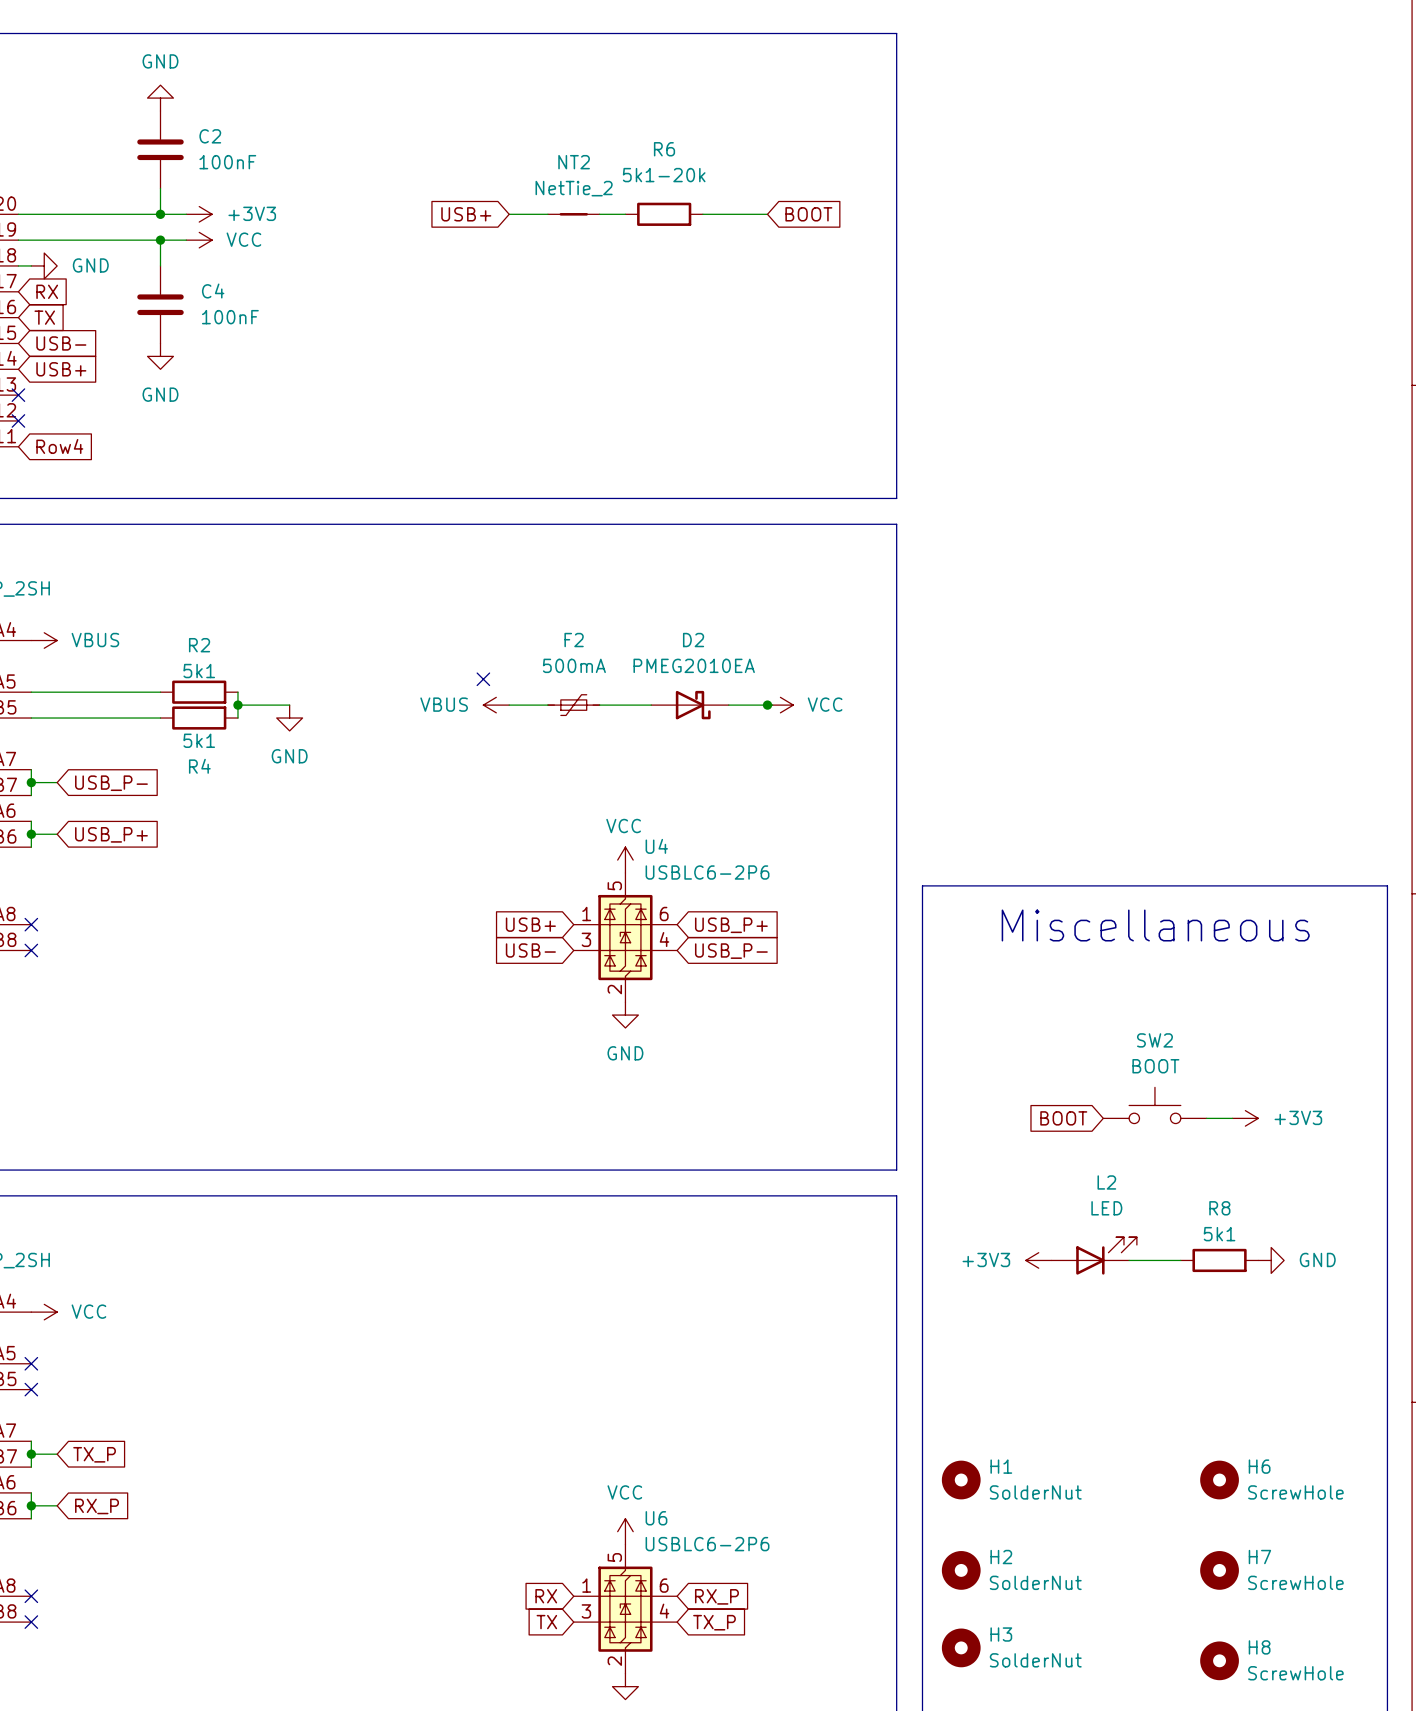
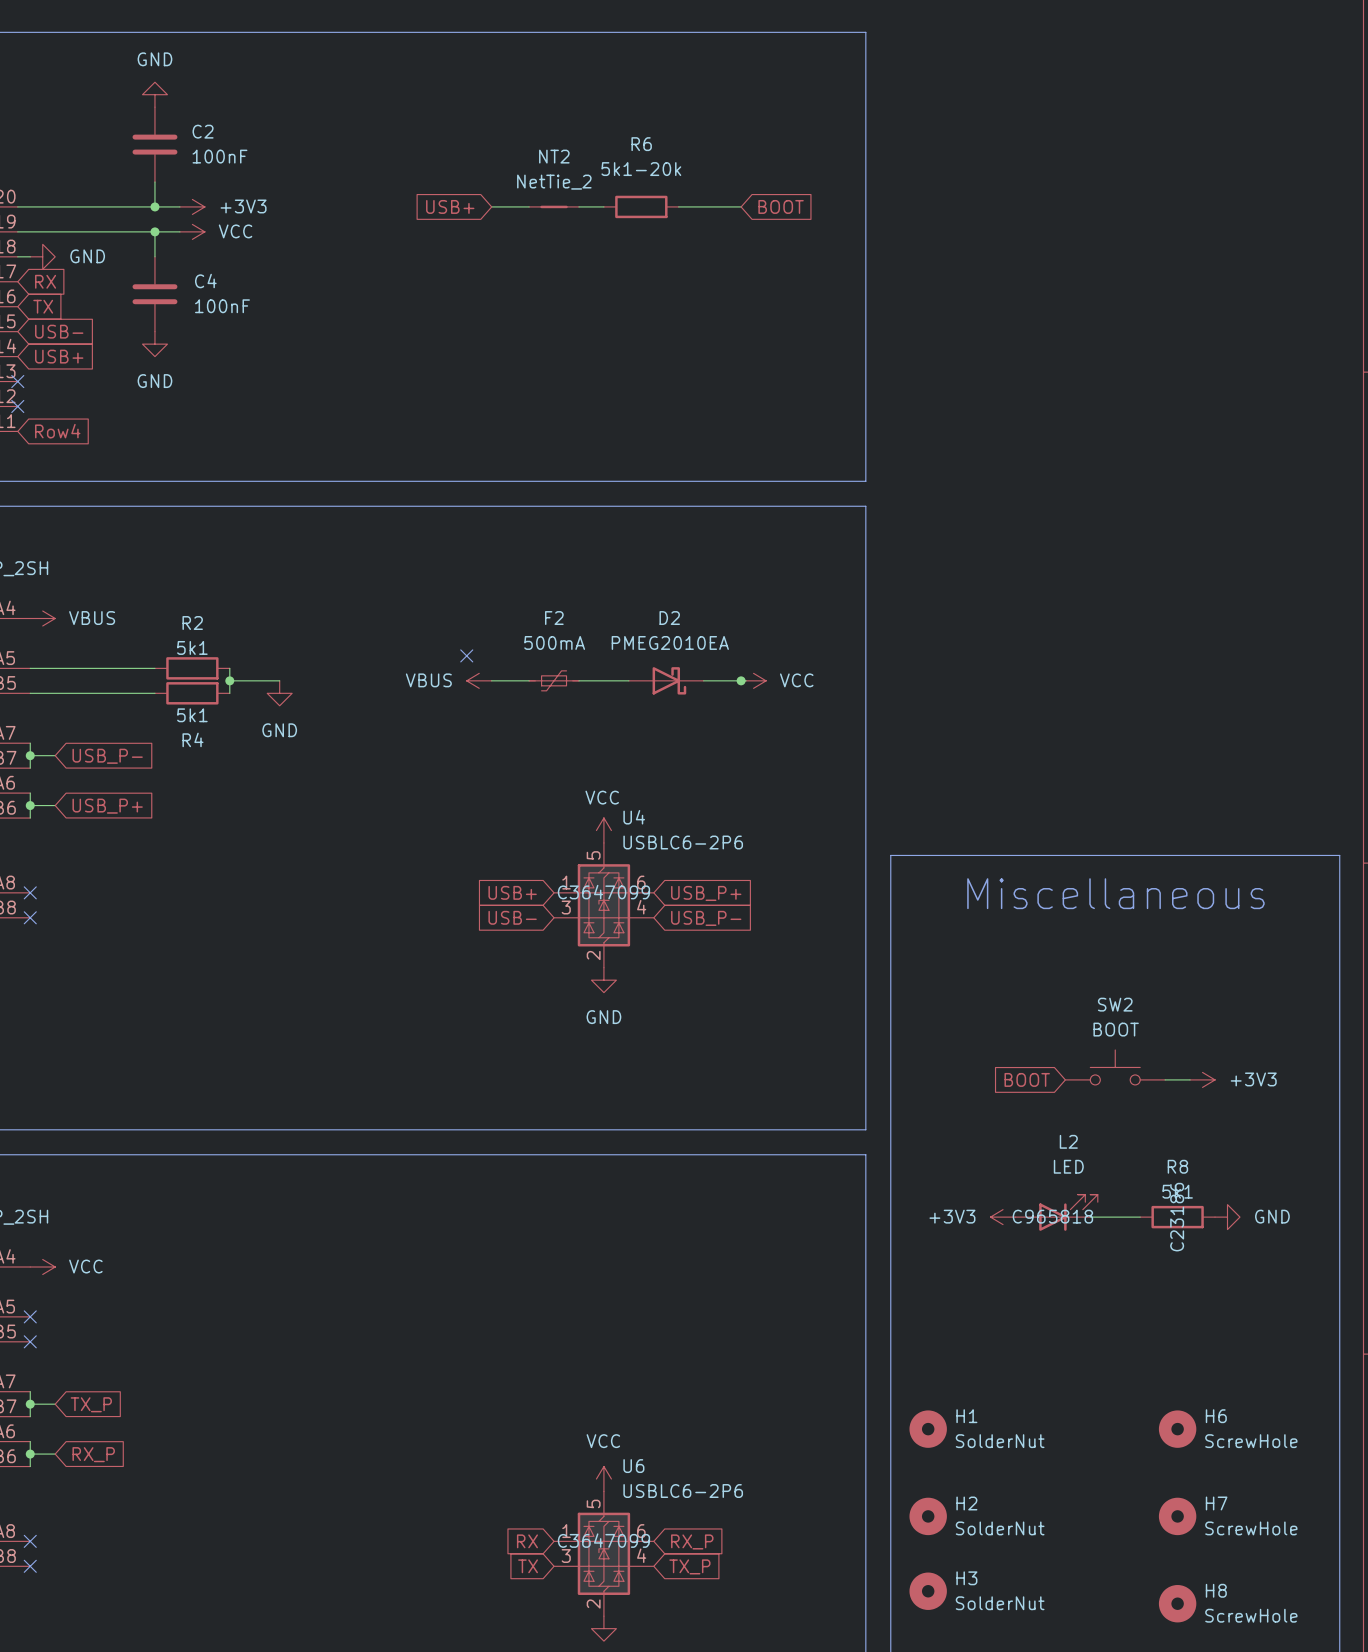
U4 text: none -> C3647099 (603, 892)
L2 text: none -> C965818 (1052, 1216)
R8 text: none -> C23186 (1177, 1217)
U6 text: none -> C3647099 (603, 1540)

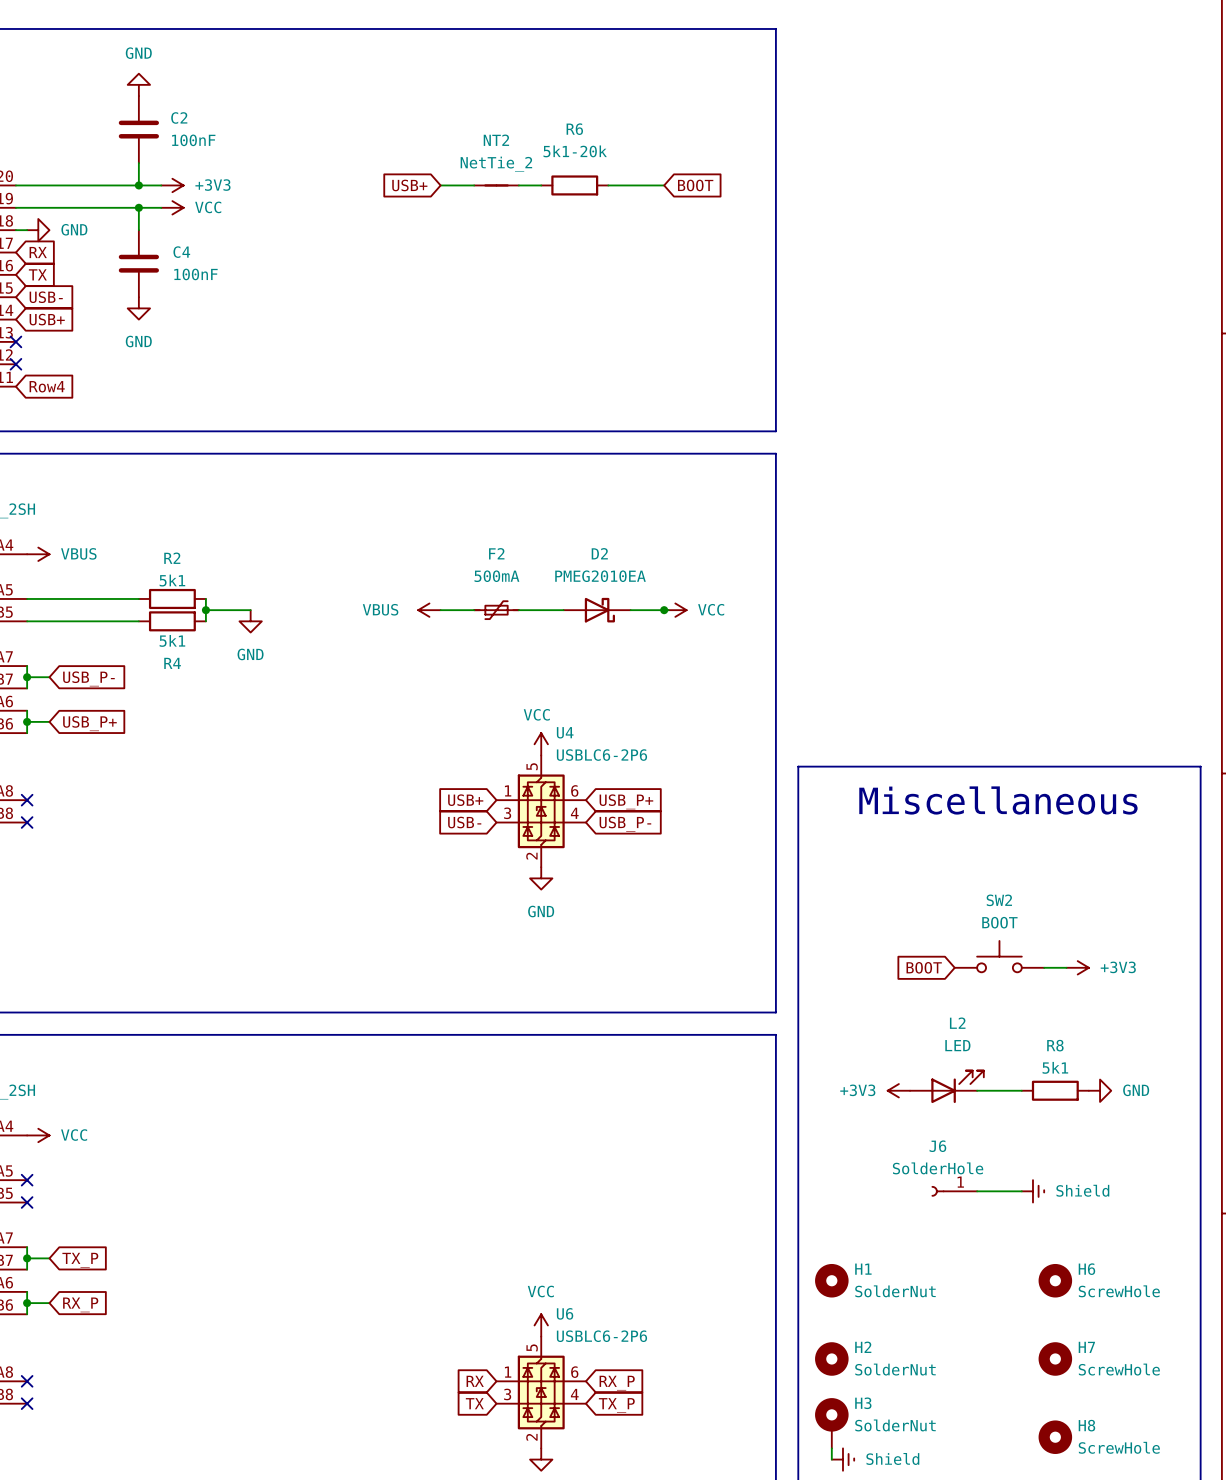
no-connect mark: (466, 655) -> none
U4 text: C3647099 (603, 892) -> none
L2 text: C965818 (1052, 1216) -> none
R8 text: C23186 (1177, 1217) -> none
J6: none -> SolderHole (954, 1191)
wire: none -> (977, 1191) (1021, 1191)
power symbol: none -> Shield (1032, 1191)
U6 text: C3647099 (603, 1540) -> none
H3 symbol: [909, 1572, 947, 1610] -> [815, 1398, 849, 1449]
wire: none -> (831, 1448) (831, 1459)
power symbol: none -> Shield (842, 1459)

